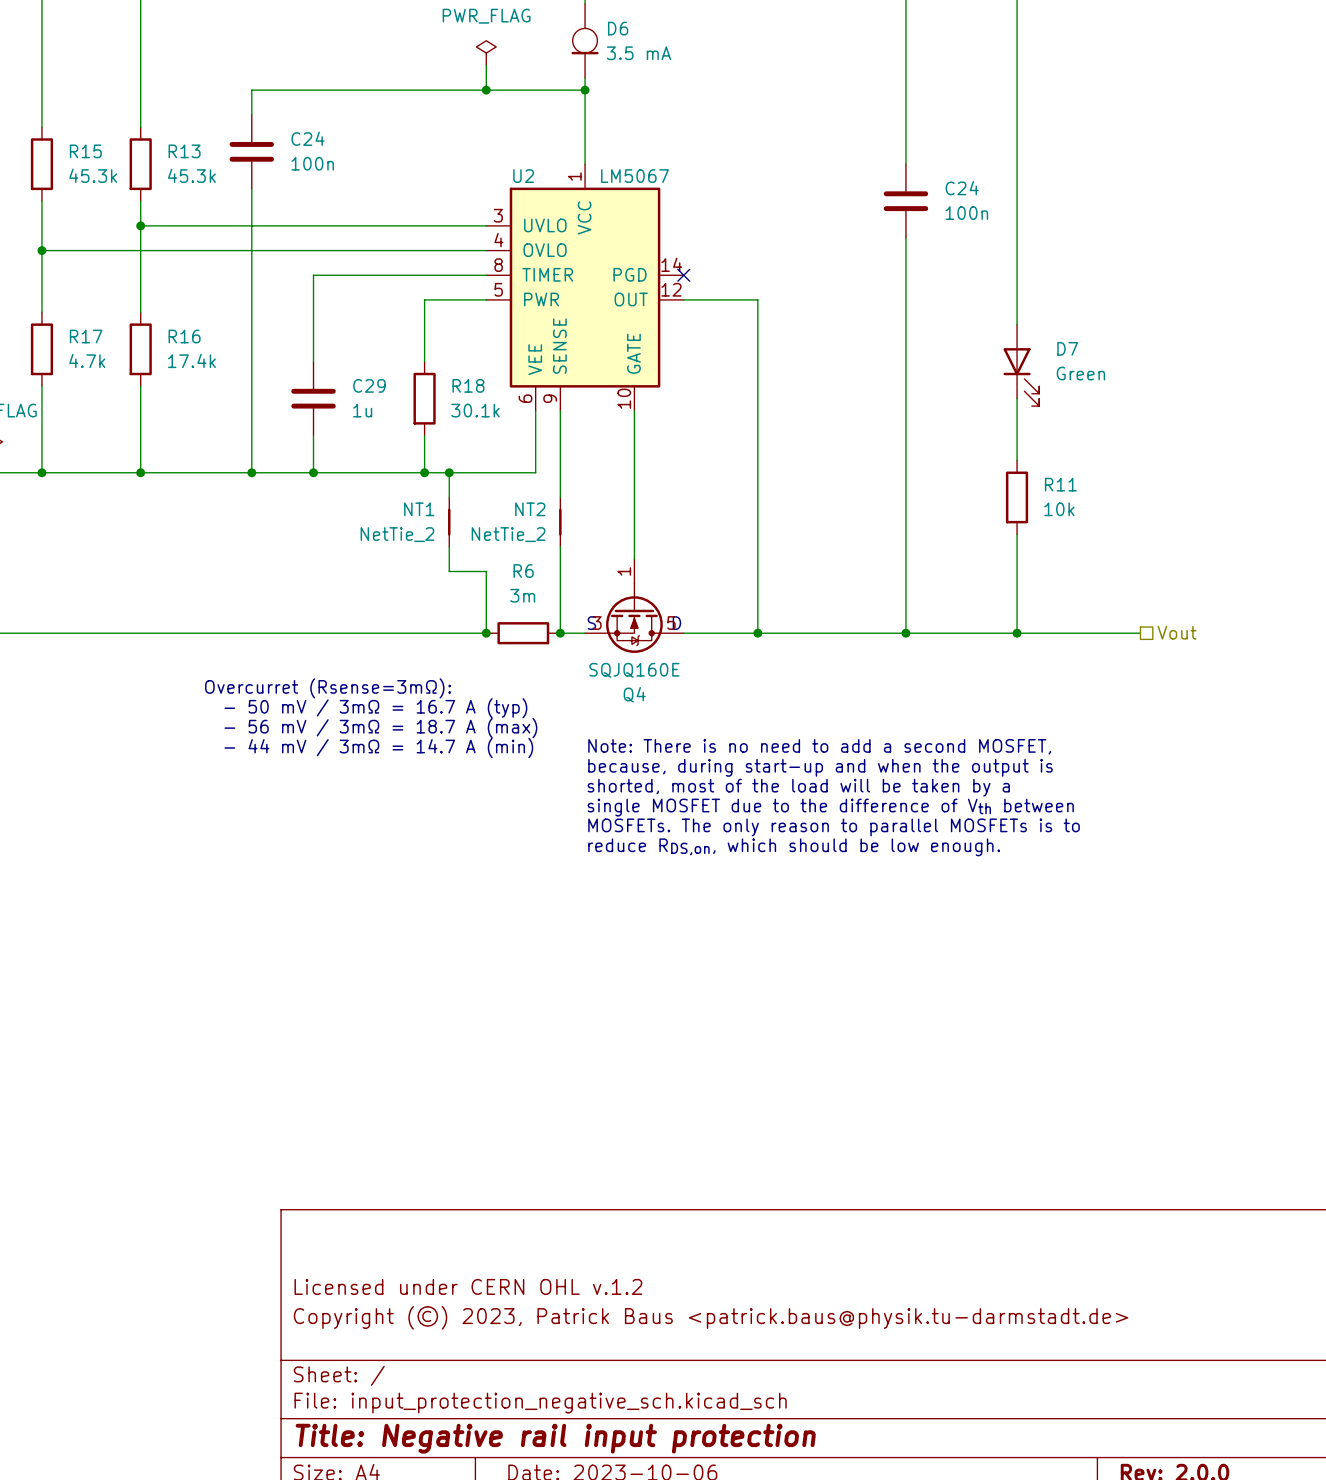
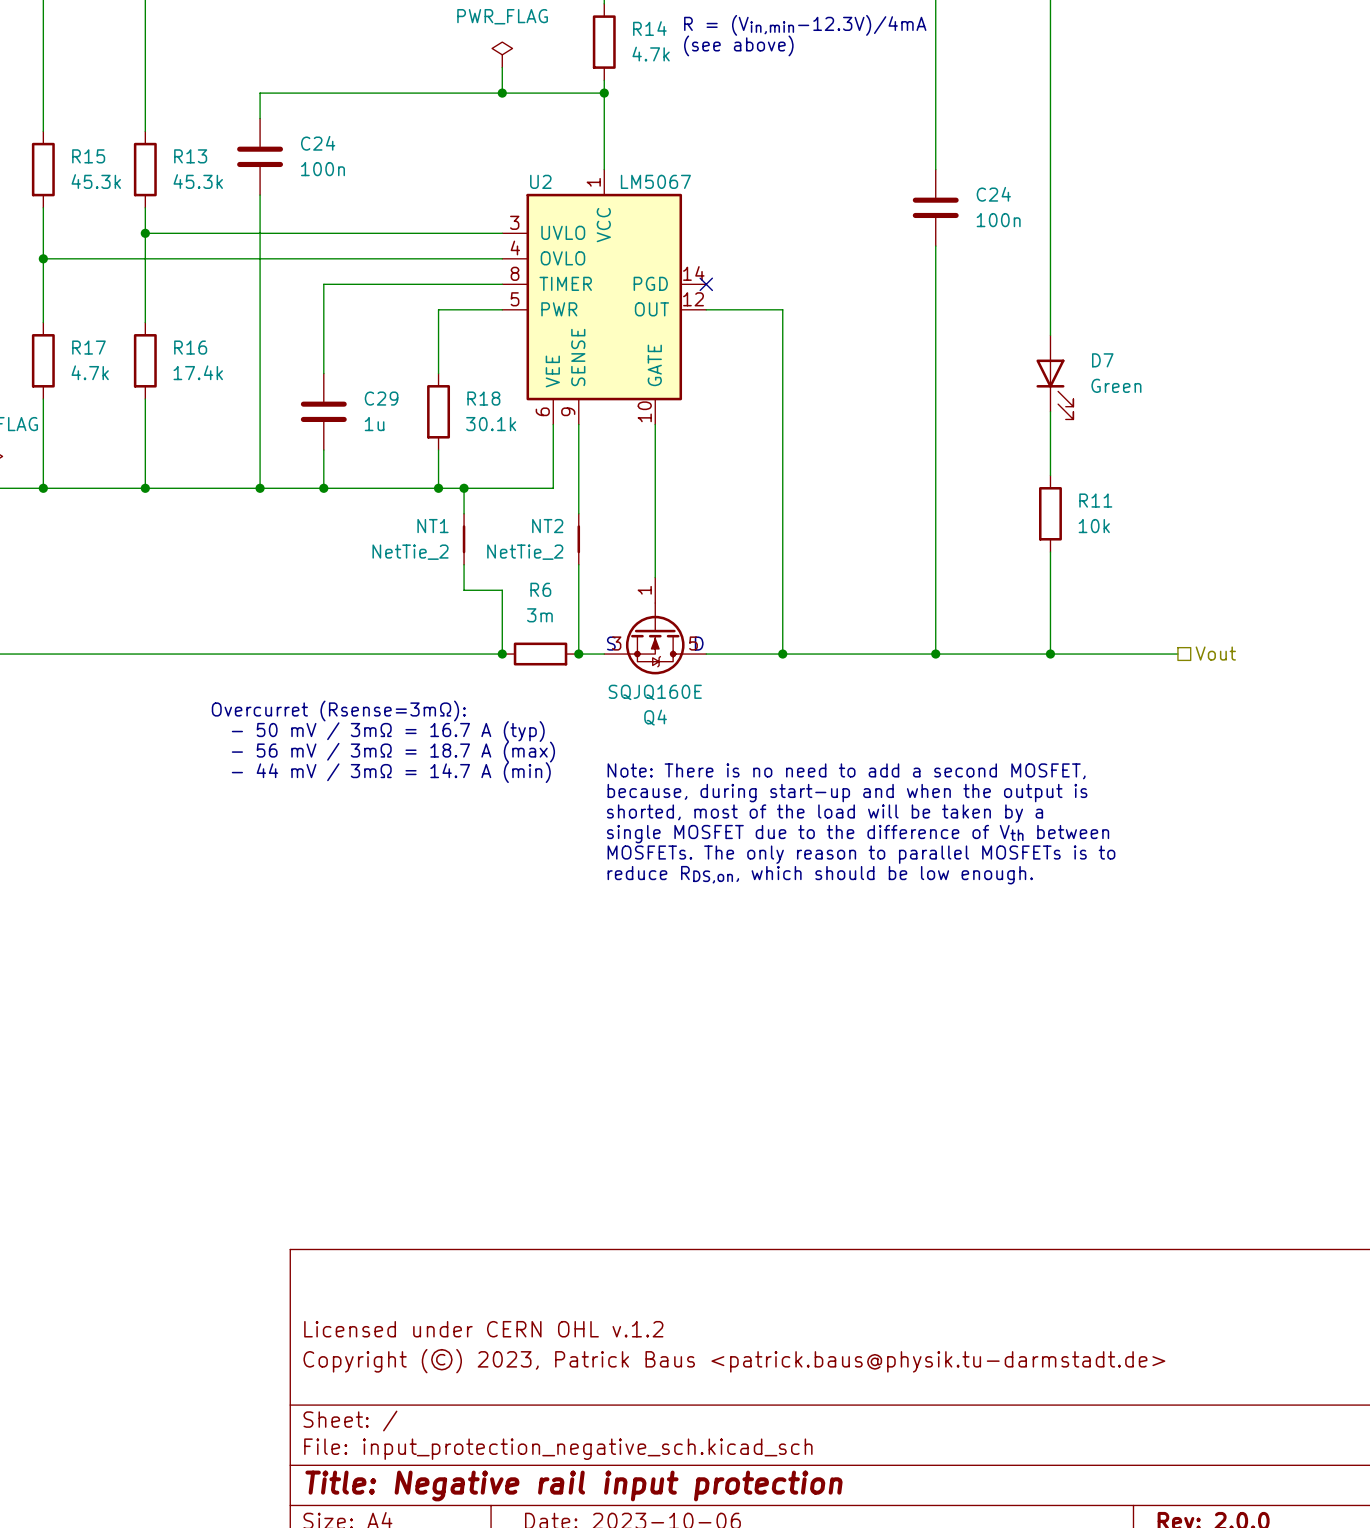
text: none -> R = (Vin,min-12.3V)/4mA (805, 25)
D6: 3.5 mA (585, 40) -> none
R14: none -> 4.7k (604, 42)
text: none -> (see above) (738, 45)

